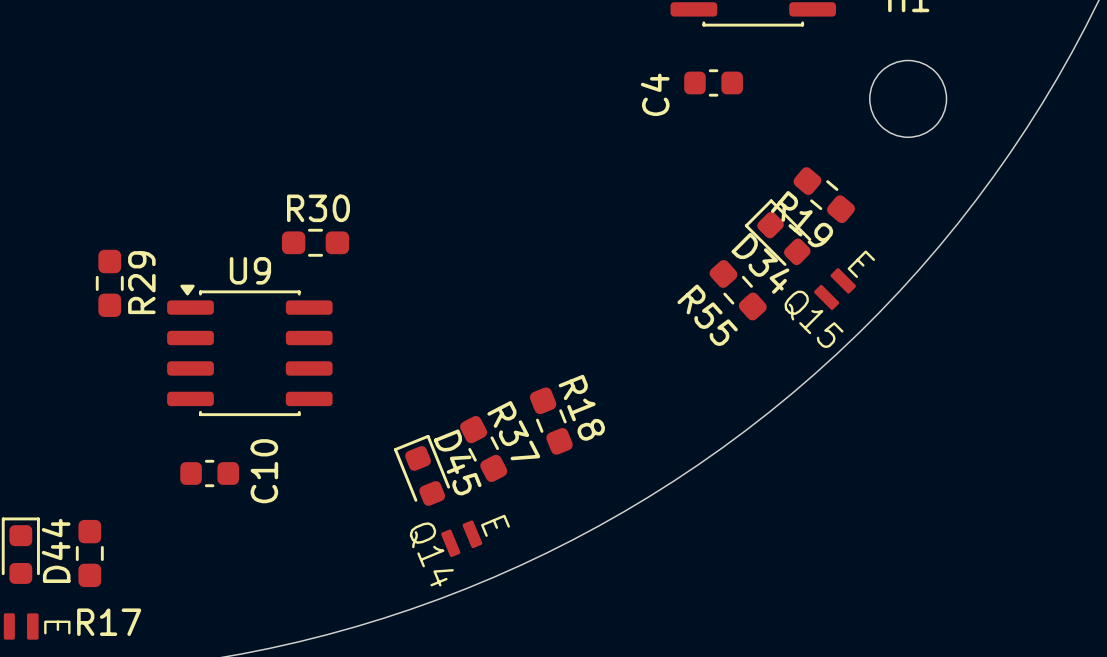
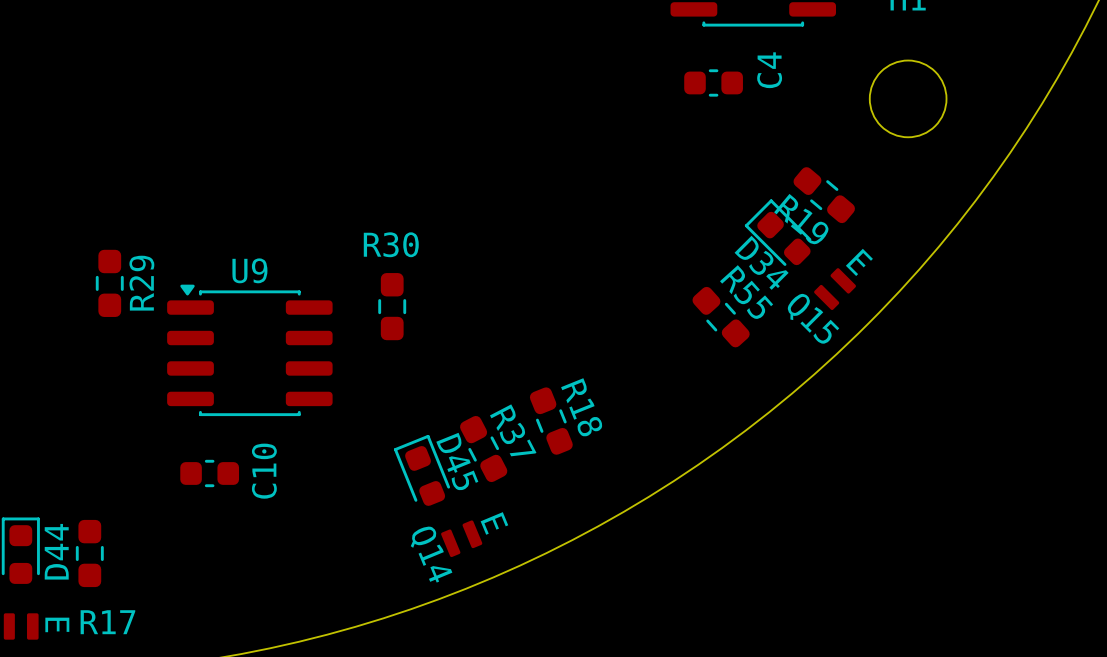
C4 name position: C4 (655, 94) -> C4 (769, 70)
R30 rotation: 0° (315, 242) -> 90° clockwise (392, 306)
R30 position: (315, 242) -> (392, 306)
R55 position: (738, 290) -> (721, 317)
R55 name position: R55 (707, 315) -> R55 (746, 292)

